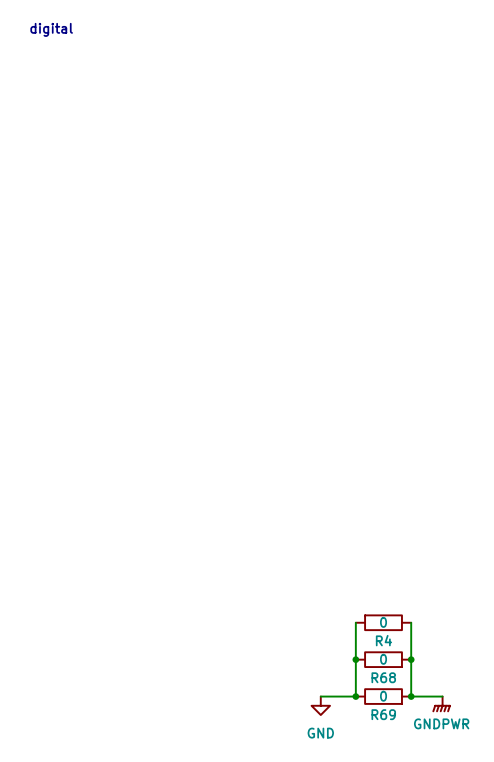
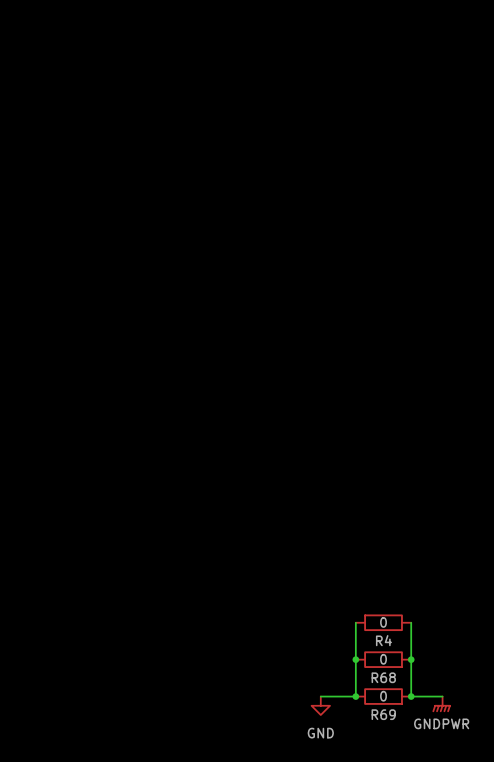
text: digital (51, 29) -> none

